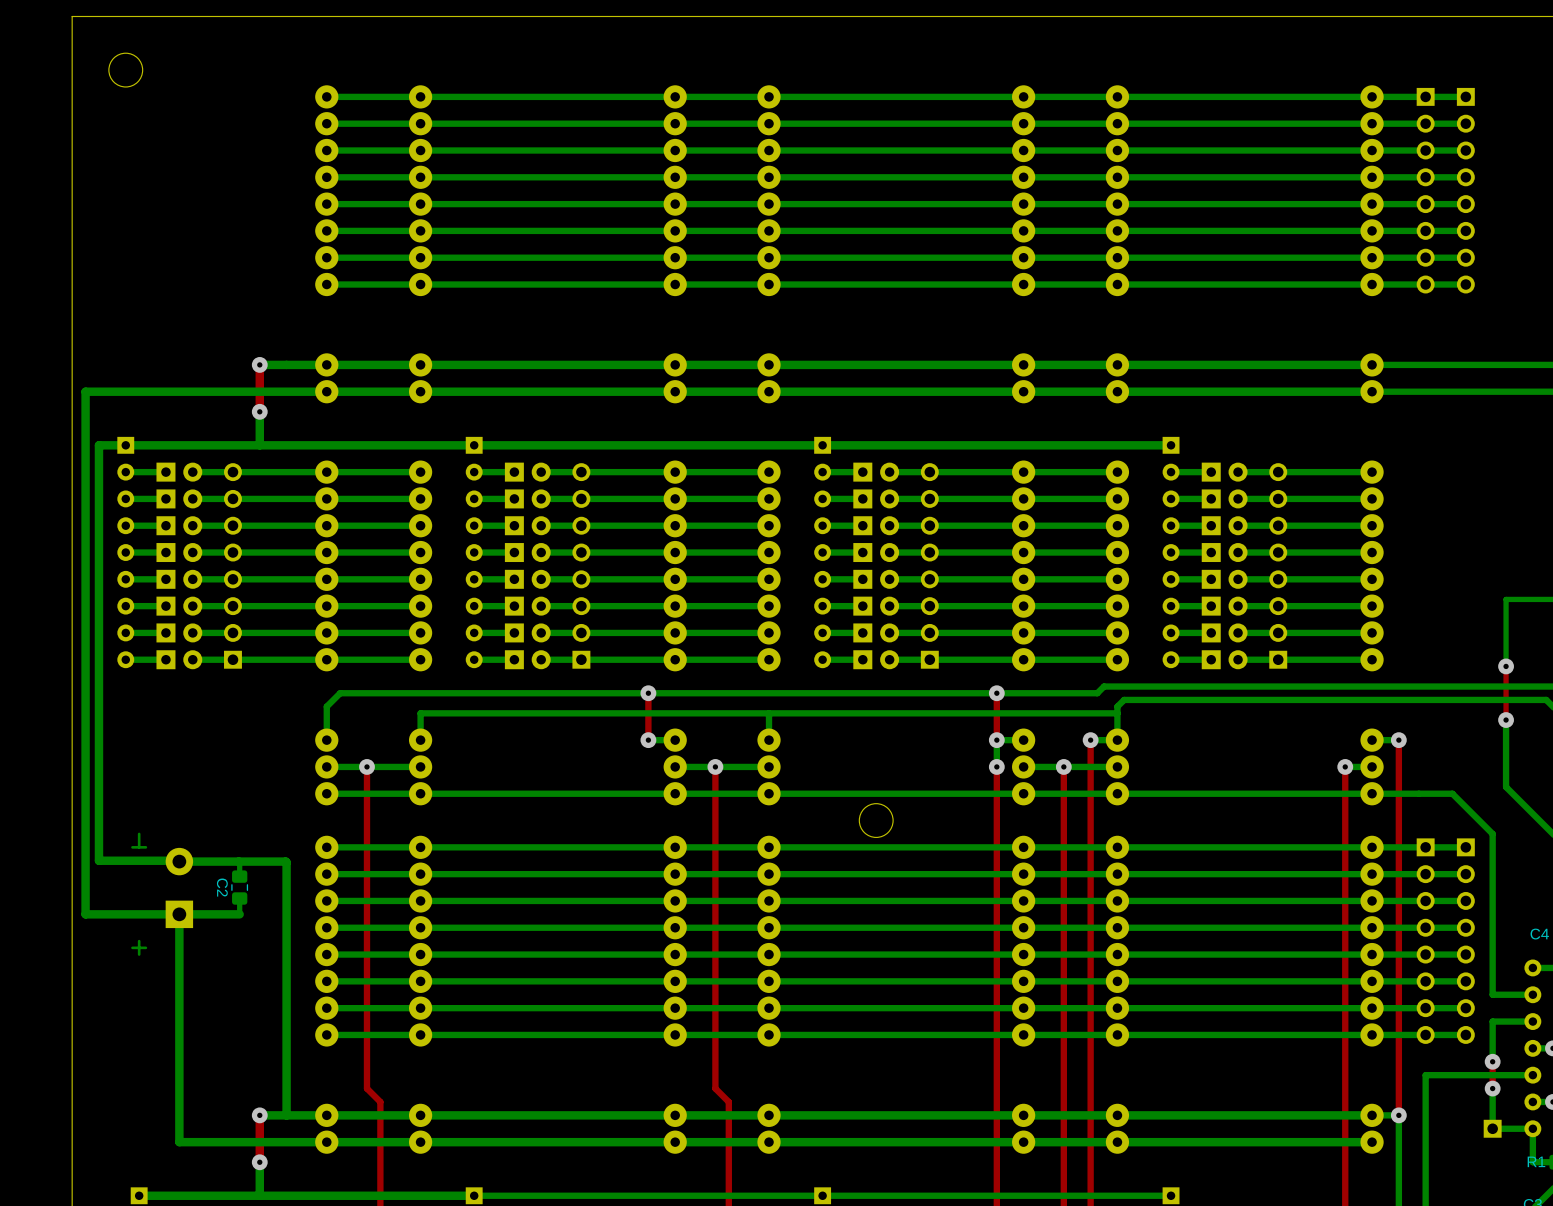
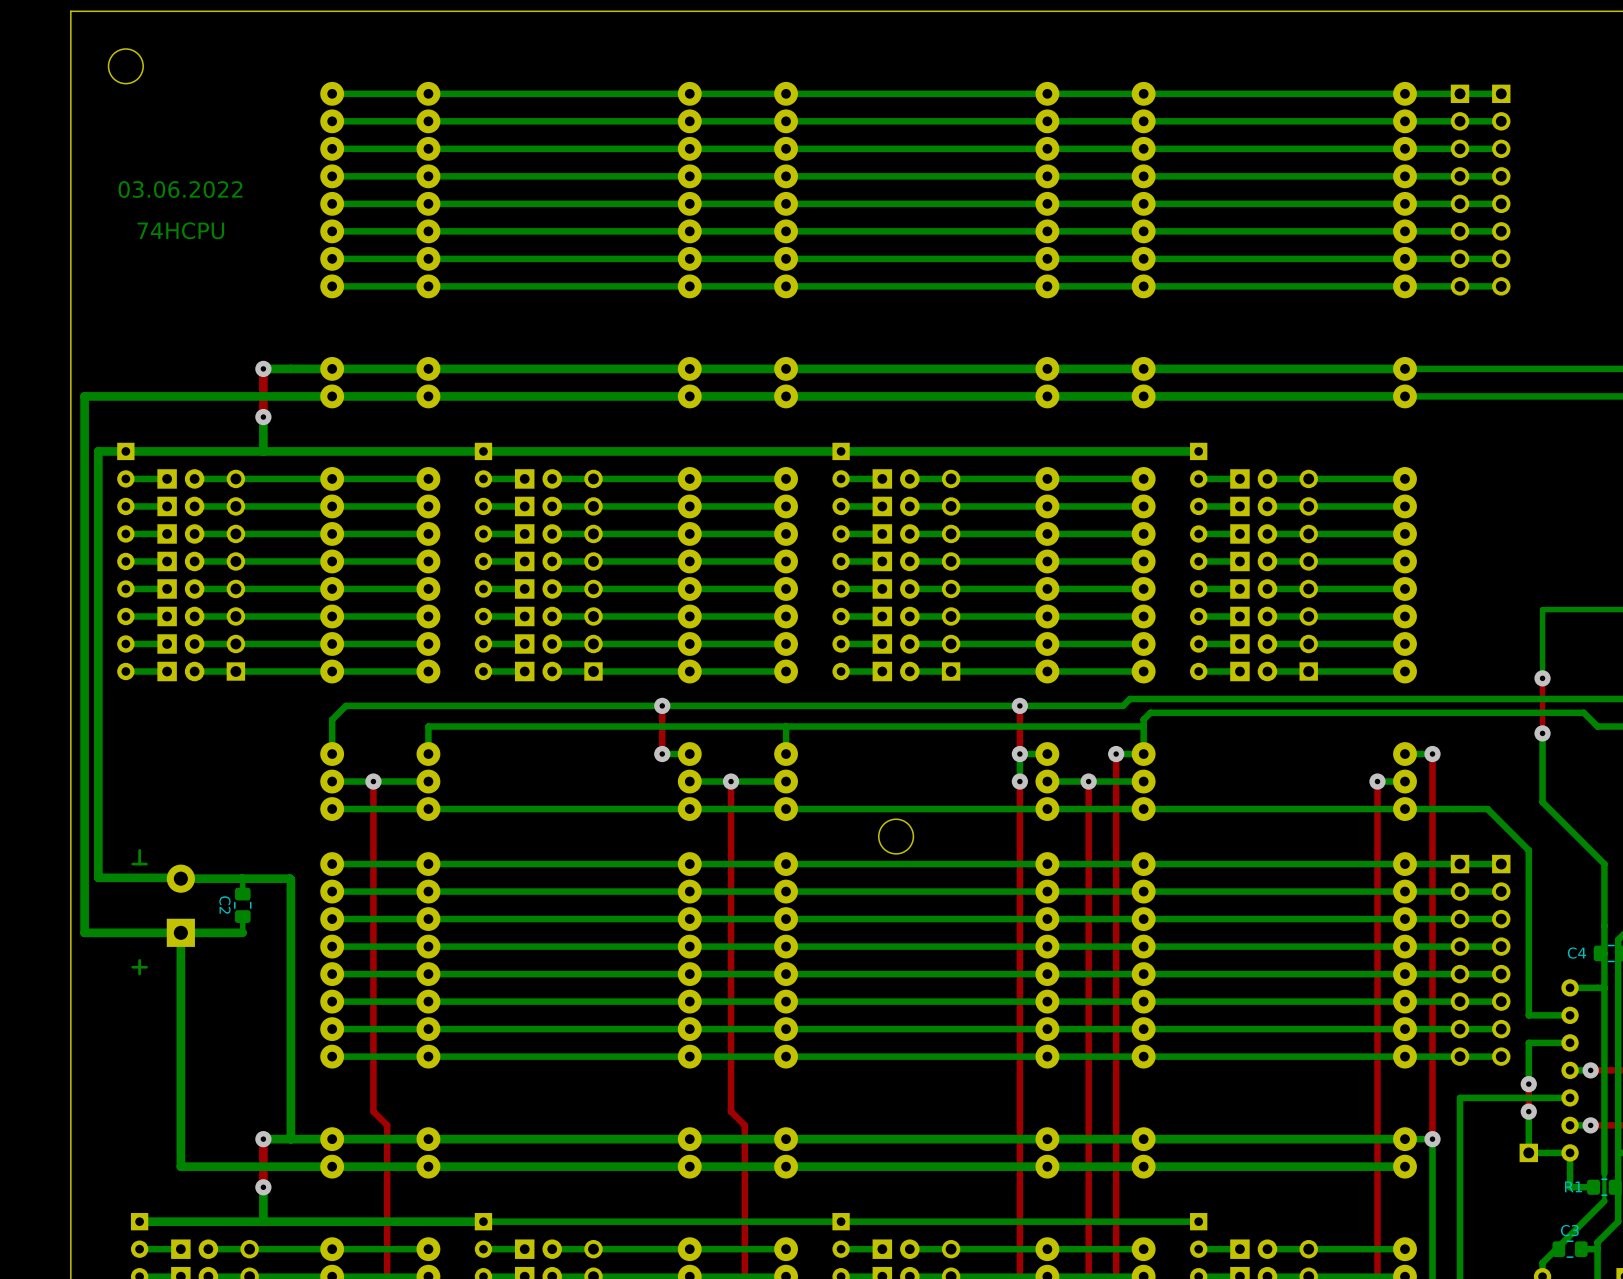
text: none -> 03.06.2022 (180, 189)
text: none -> 74HCPU (180, 230)

